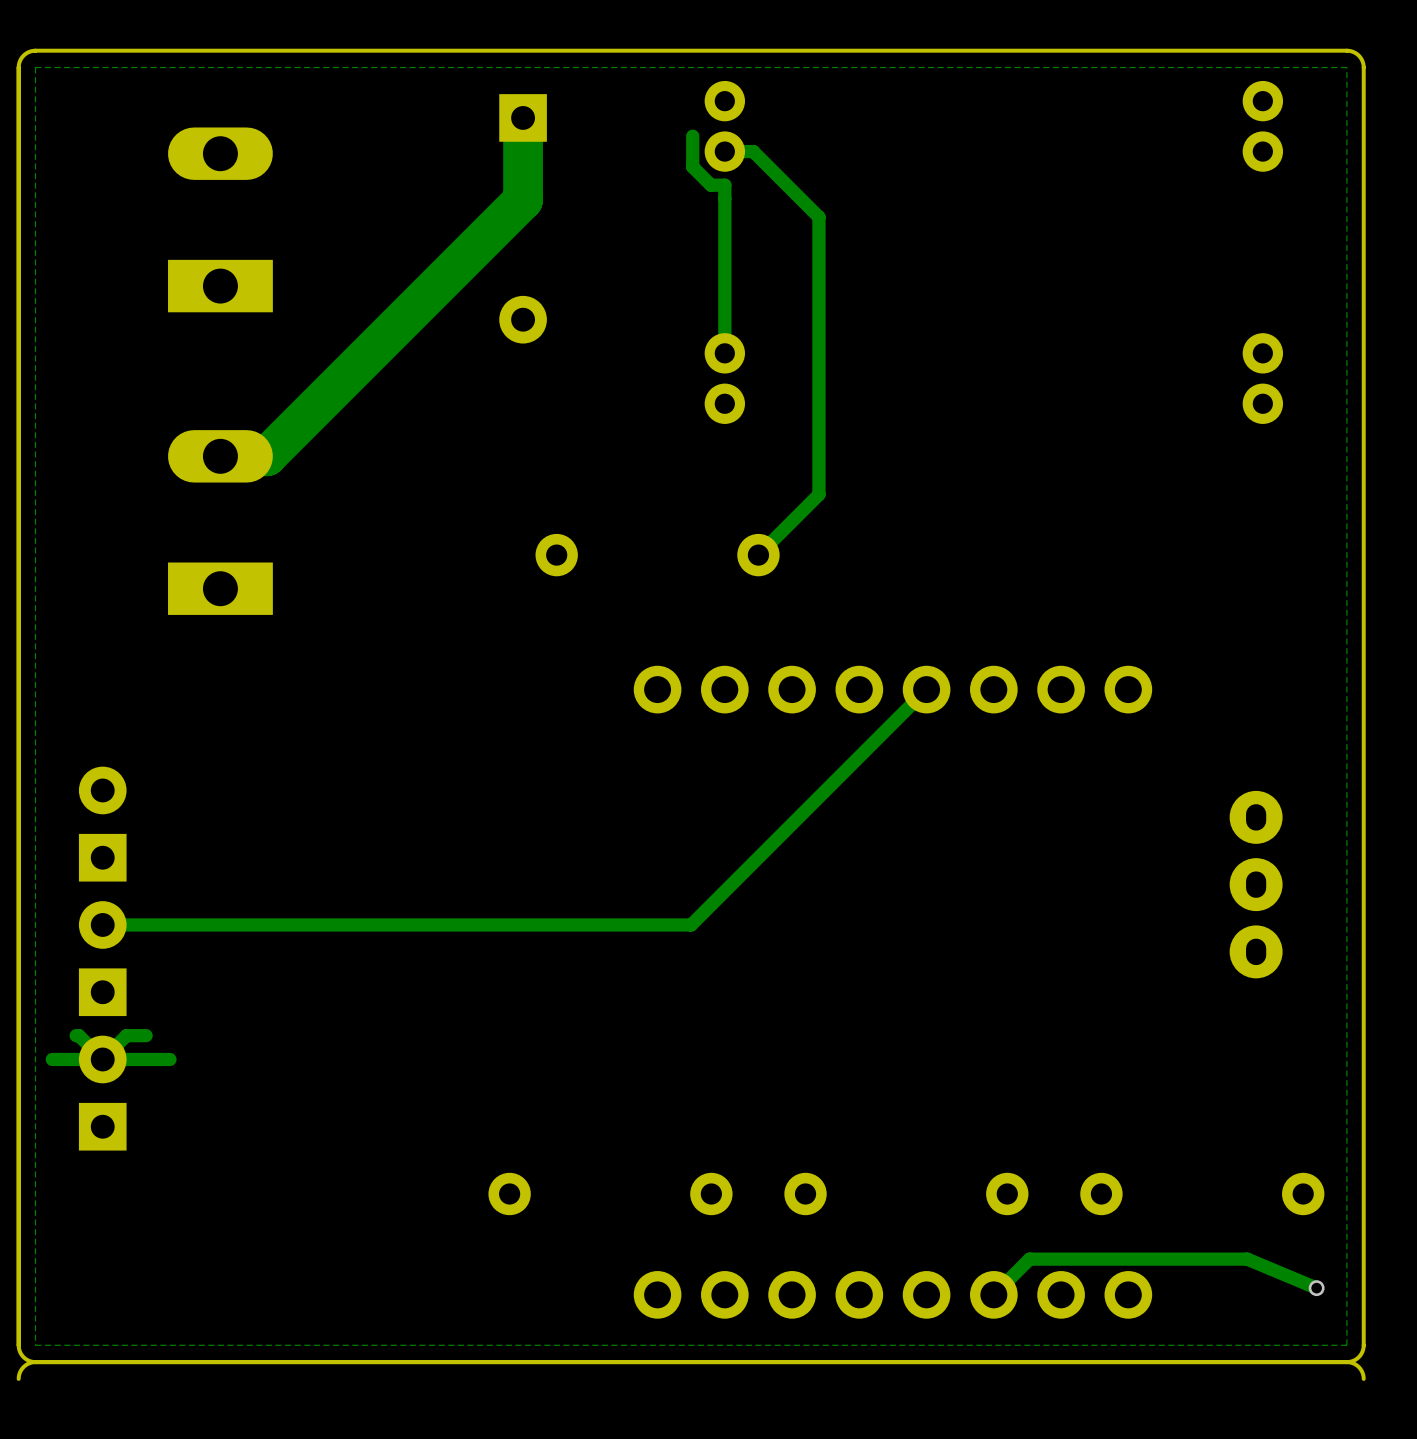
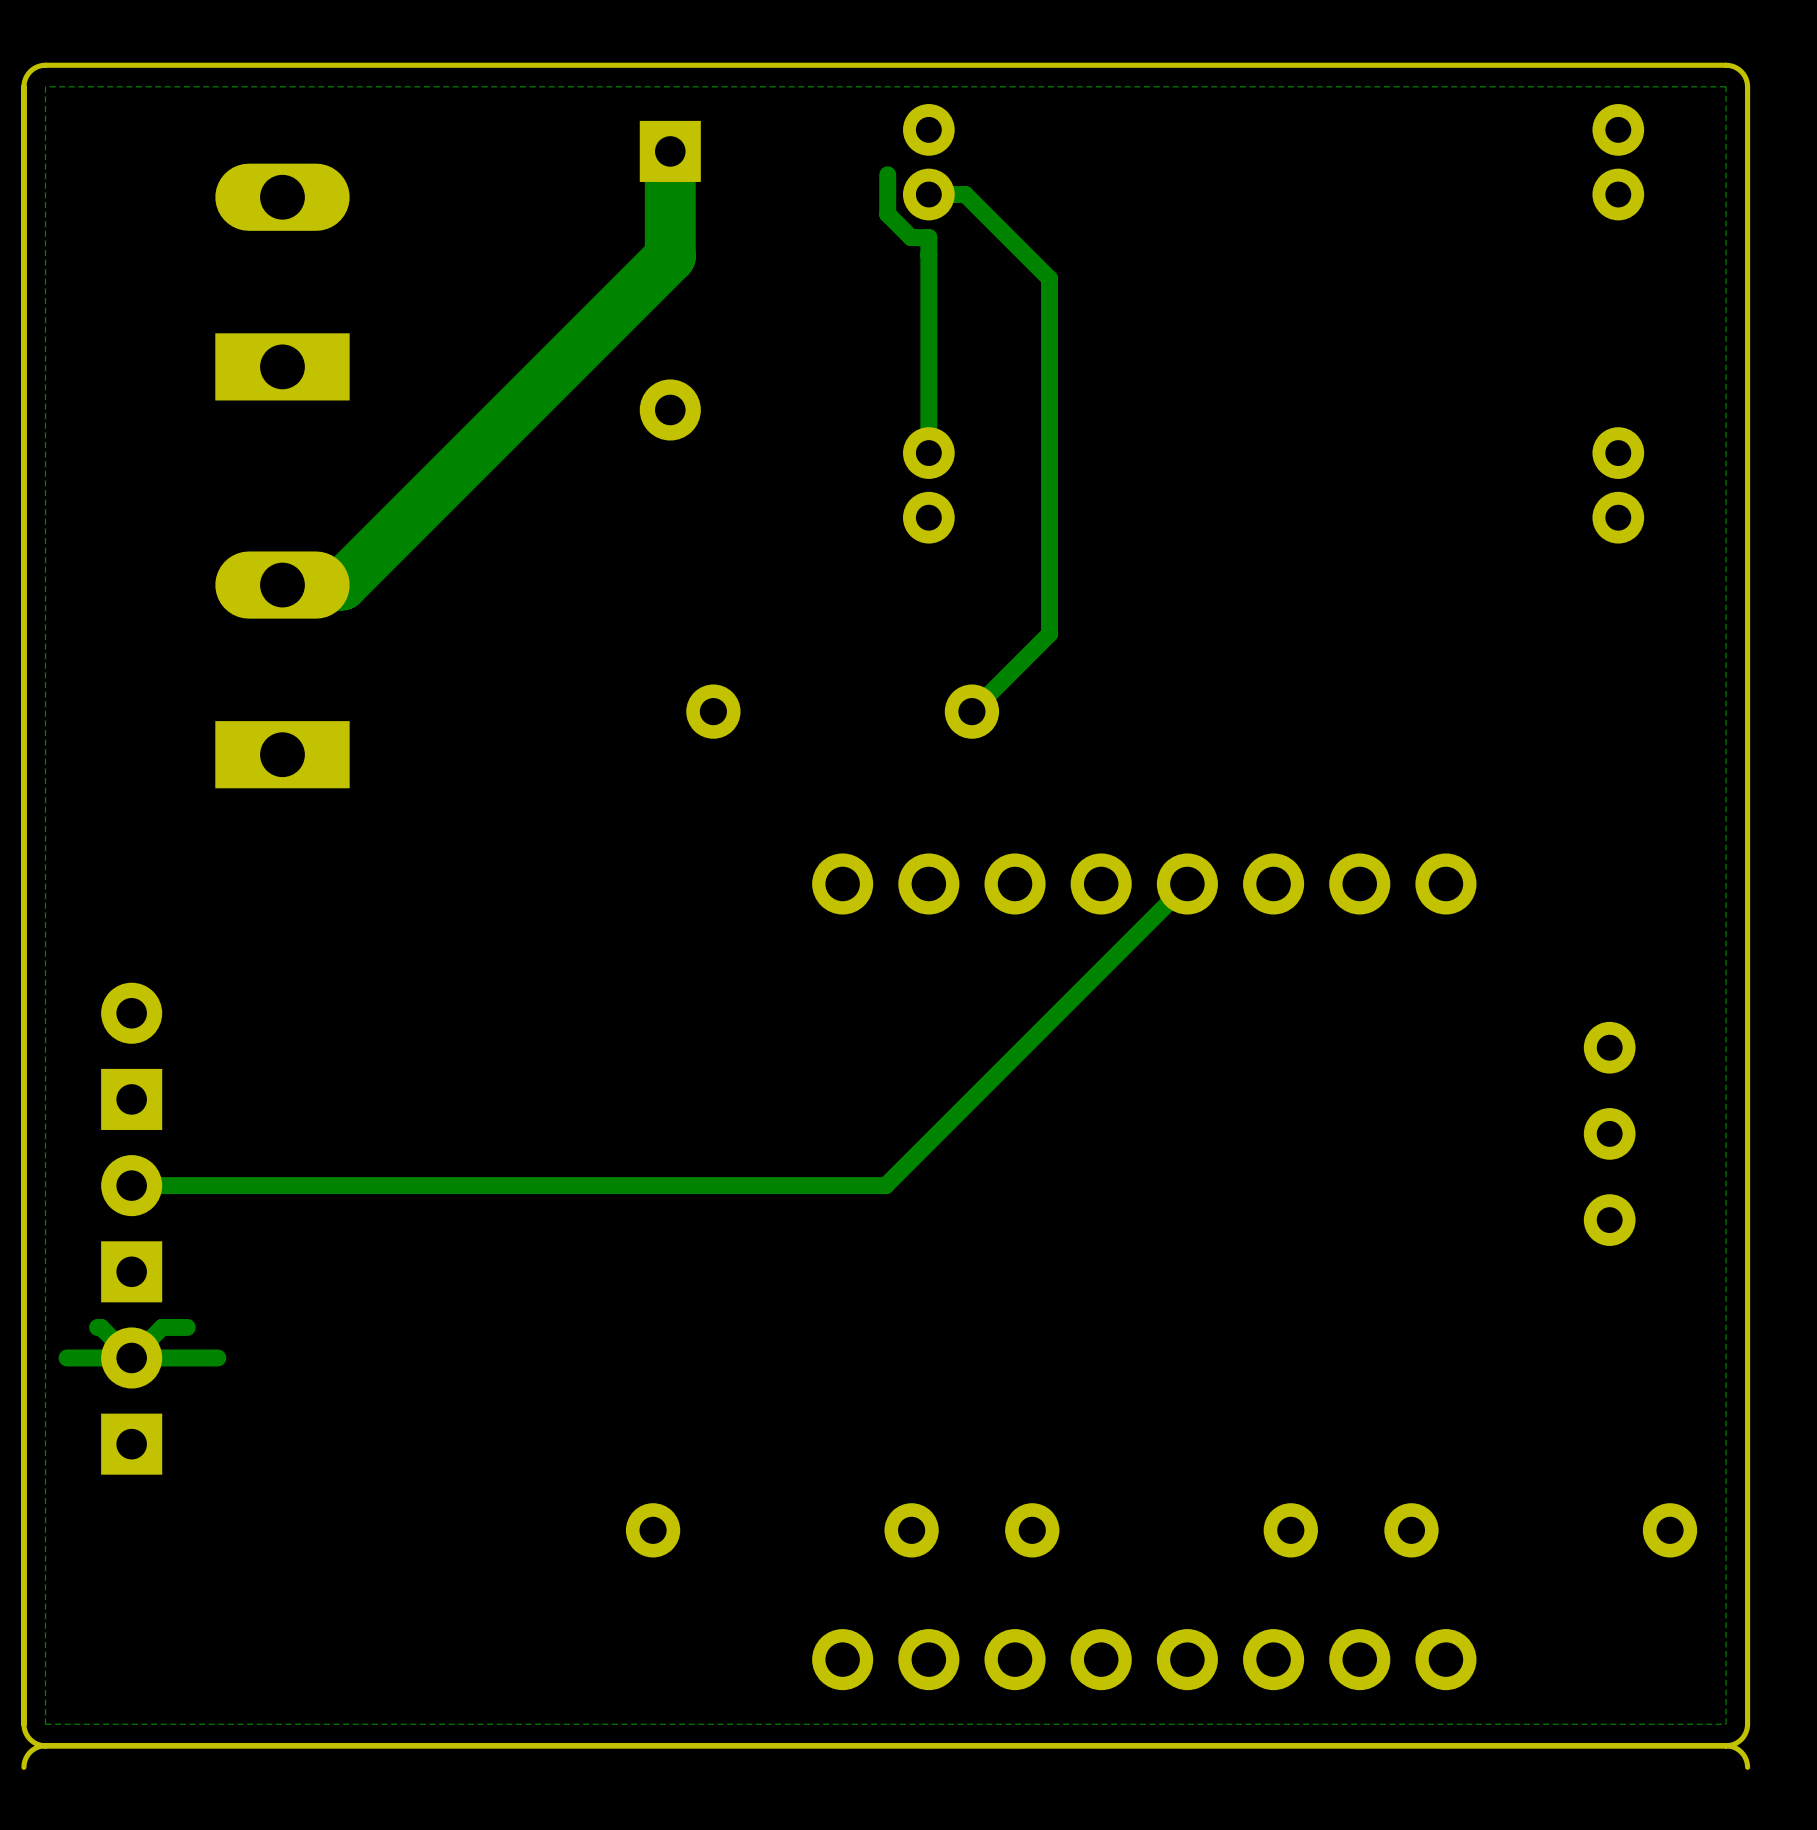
part footprint: [1229, 790, 1283, 979] -> [1583, 1021, 1636, 1246]
track: (1316, 1288) (1247, 1259) (1029, 1259) (993, 1294) -> none
via: (1316, 1288) -> none

